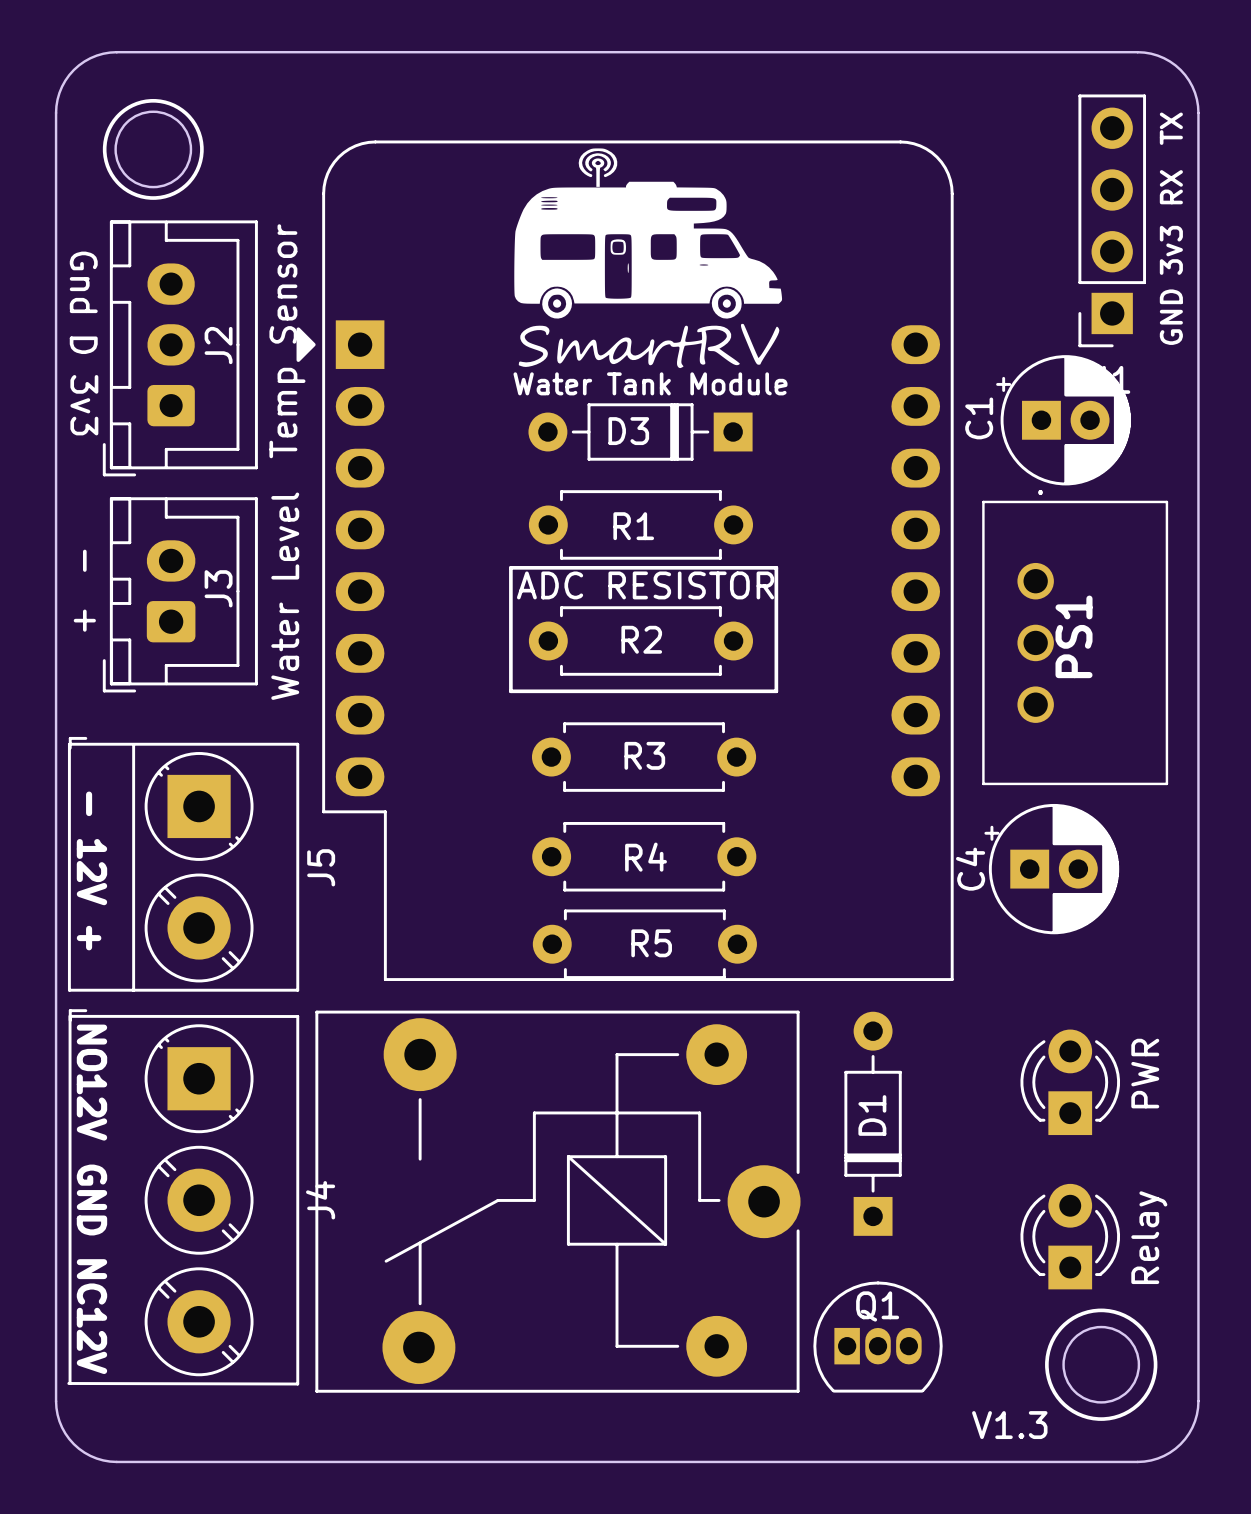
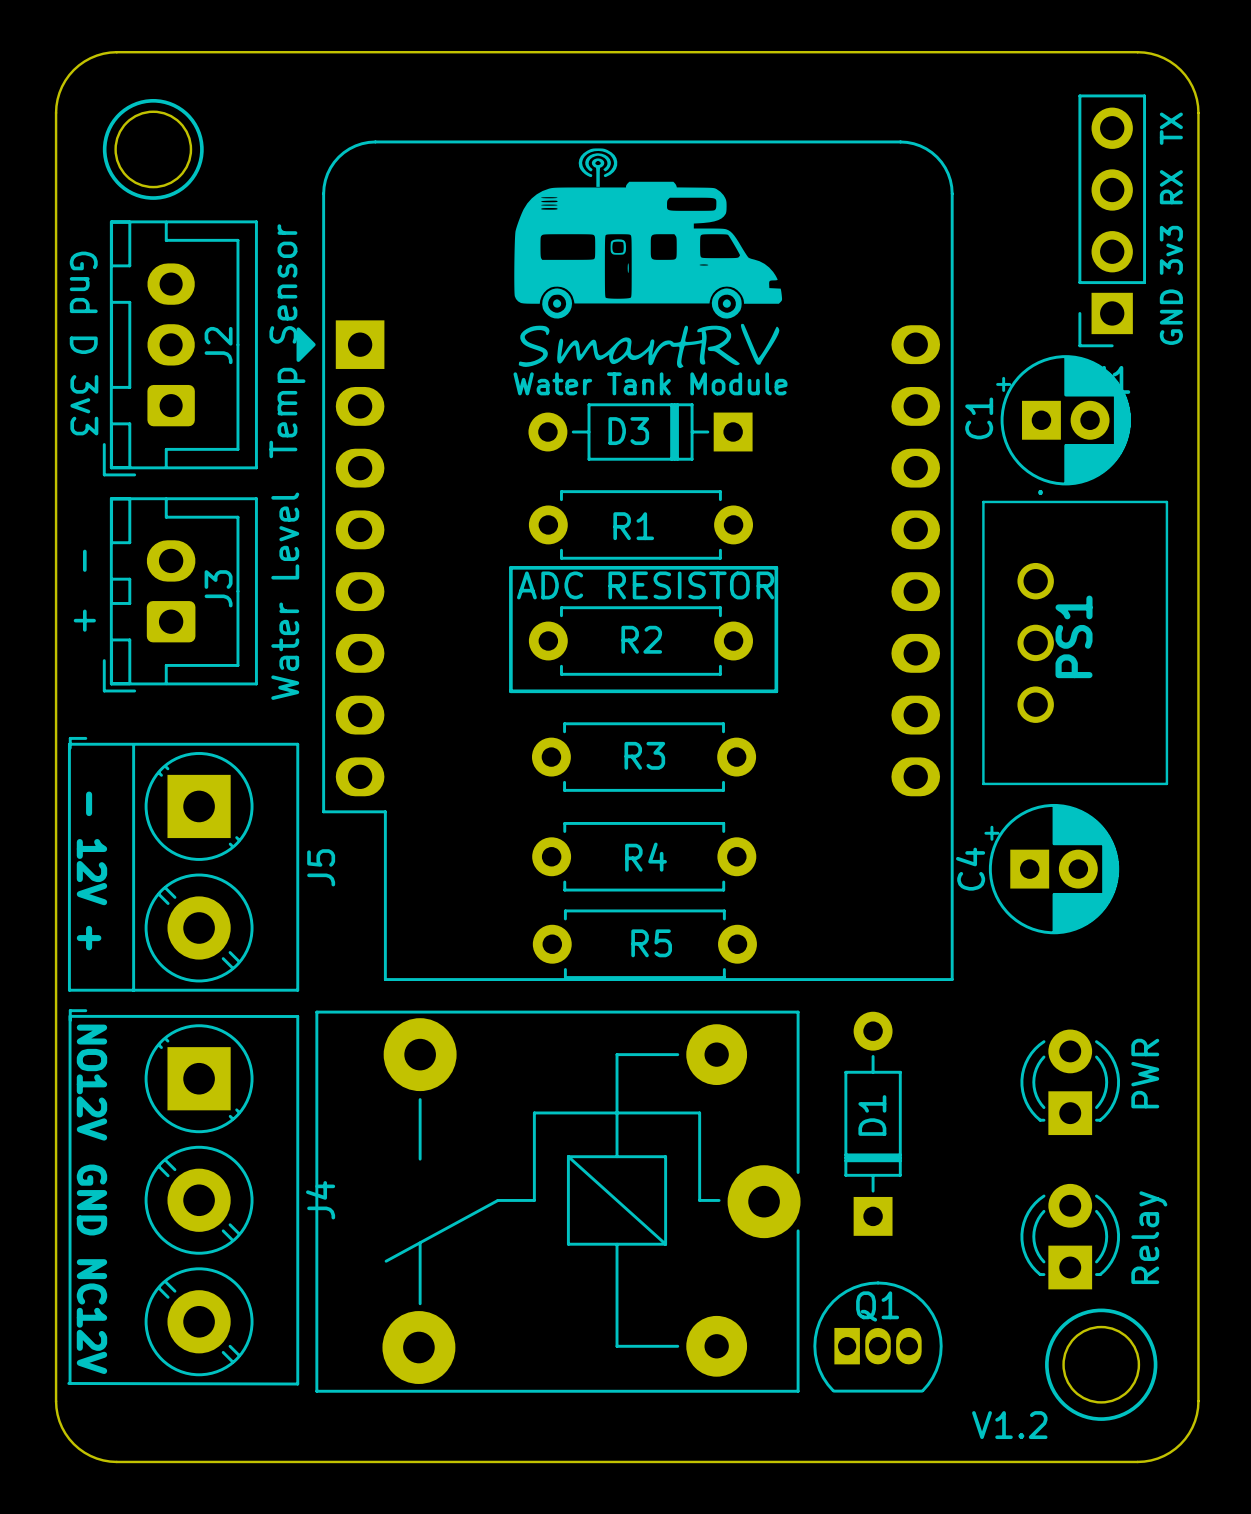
text: V1.3 (1009, 1425) -> V1.2 (1009, 1425)

